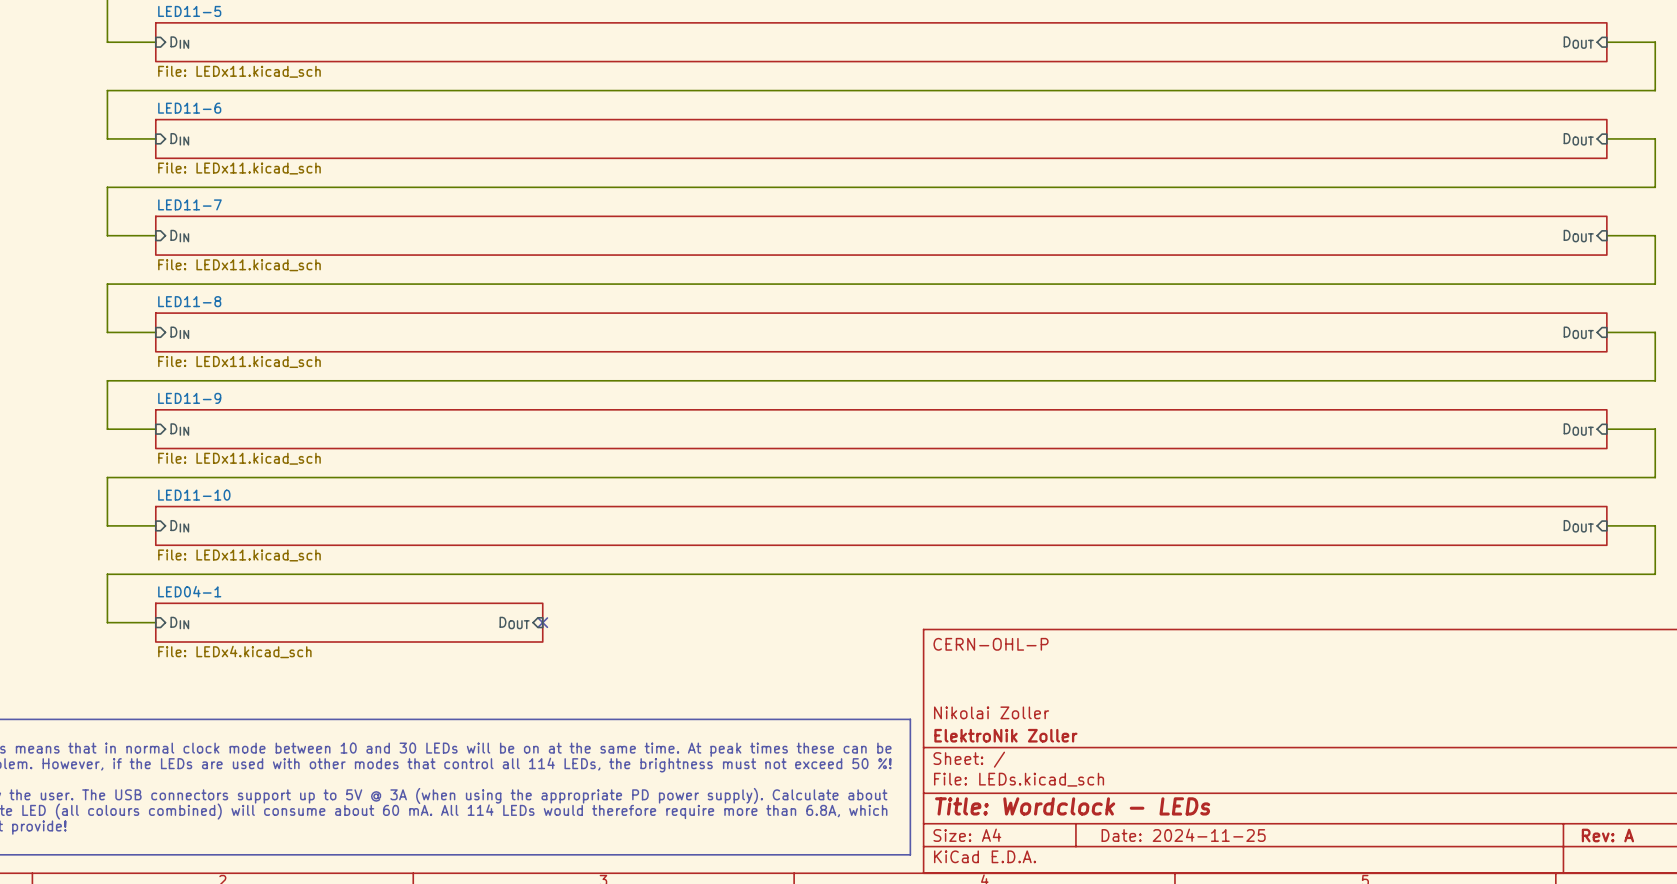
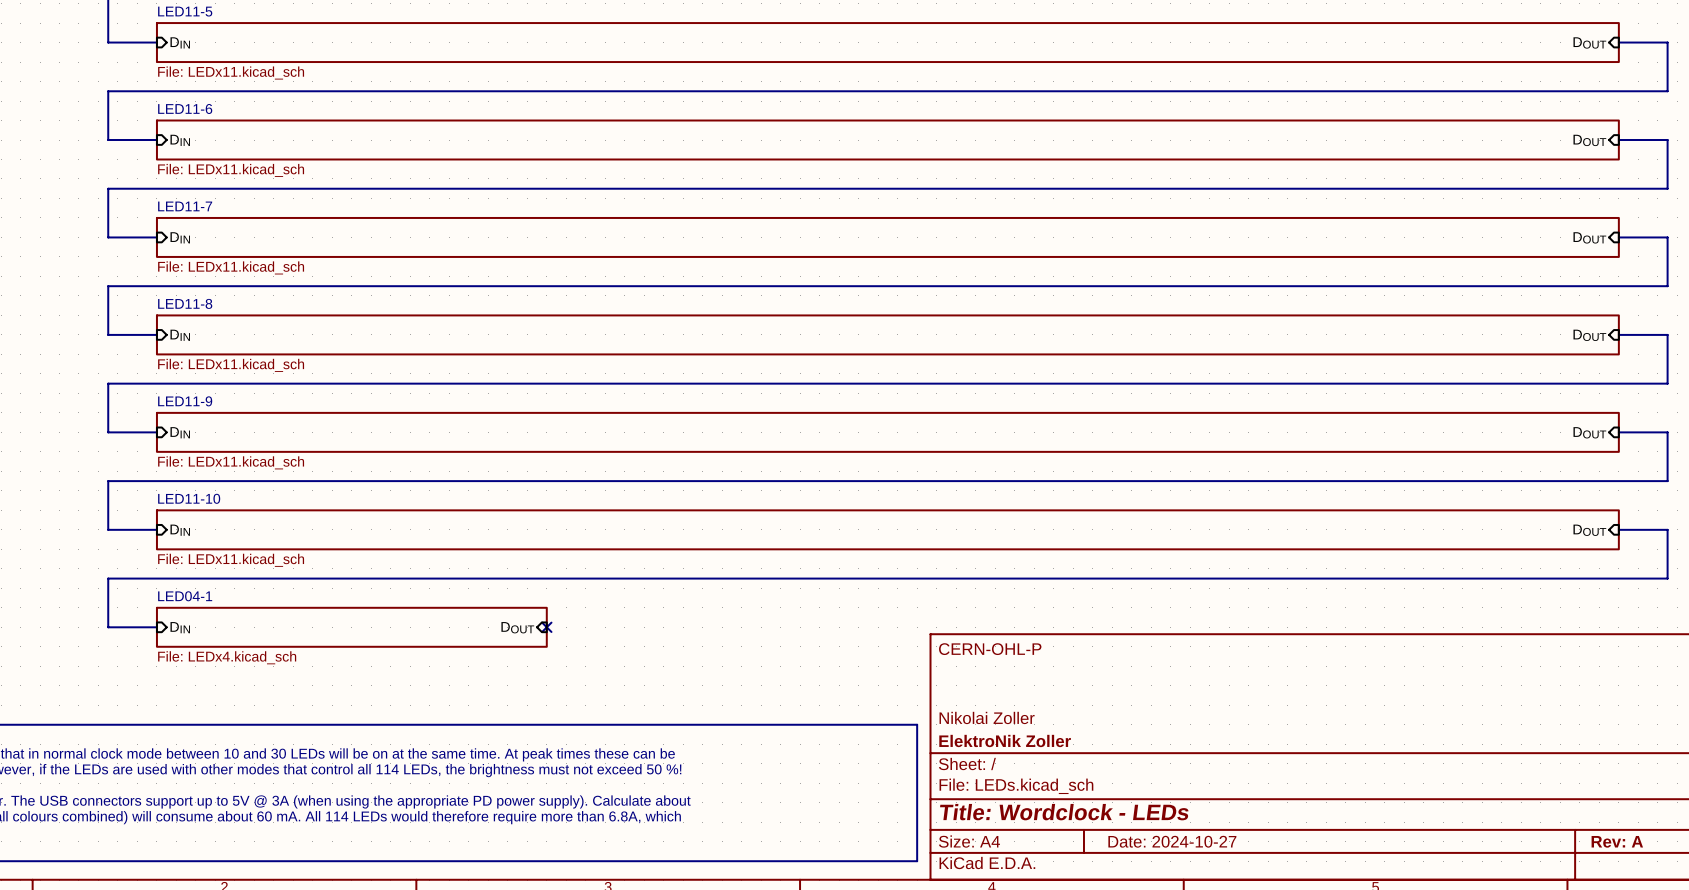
title block: Date: 2024-11-25 (1183, 835) -> Date: 2024-10-27 (1172, 841)

